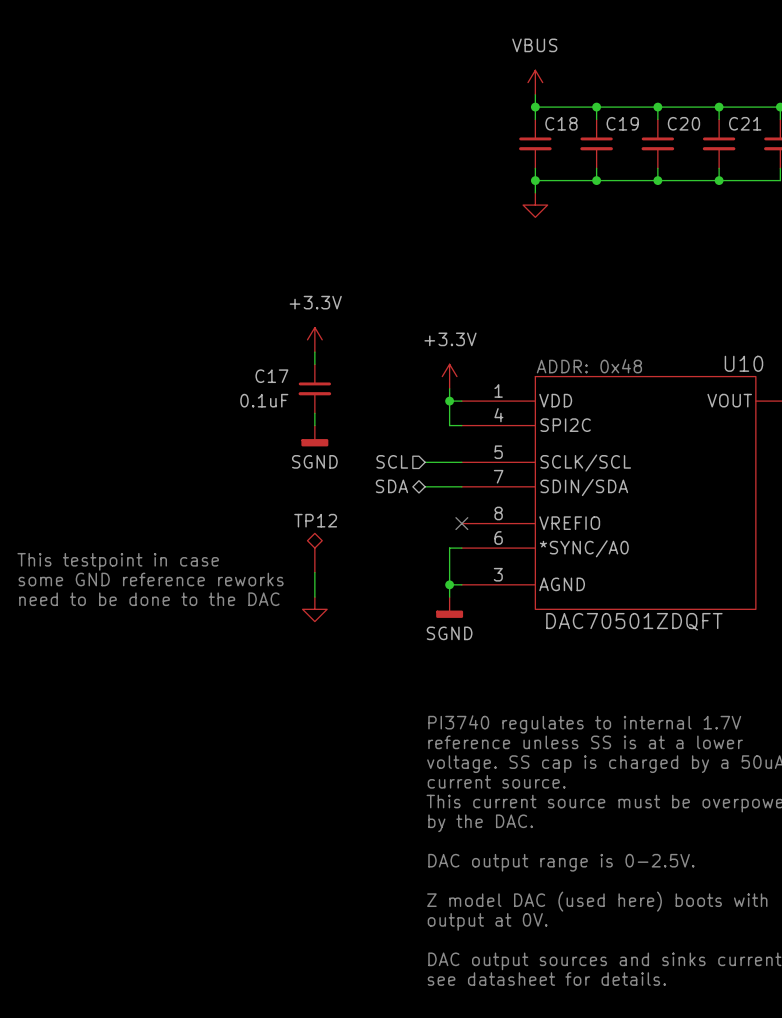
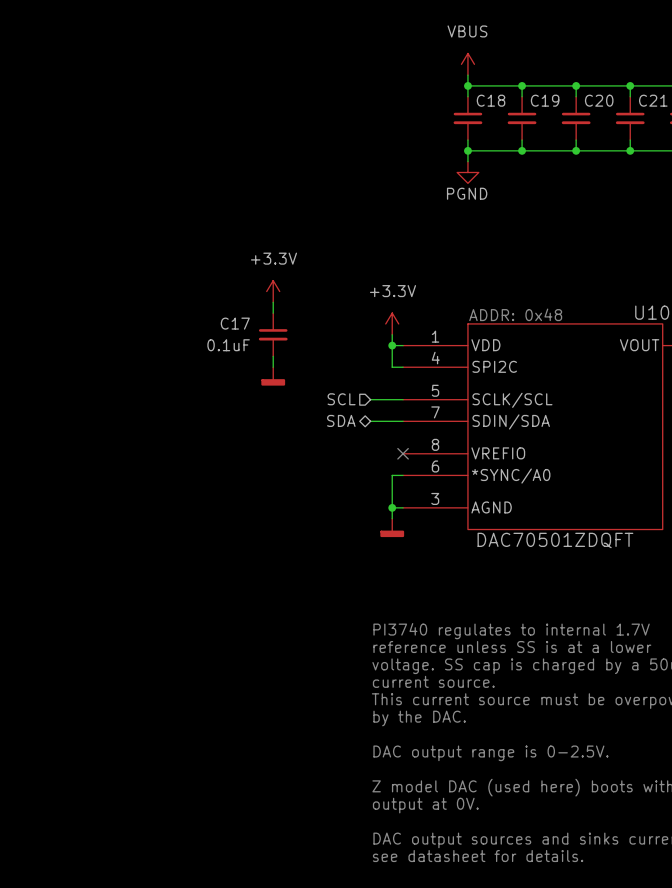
power symbol text: none -> PGND (467, 193)
power symbol text: SGND (314, 461) -> none
TP12: (314, 552) -> none
text: This testpoint in case (118, 561) -> none
wire: (314, 572) (314, 597) -> none
text: some GND reference reworks (151, 579) -> none
text: need to be done to the DAC (149, 599) -> none
power symbol: (314, 609) -> none
power symbol text: SGND (449, 633) -> none

